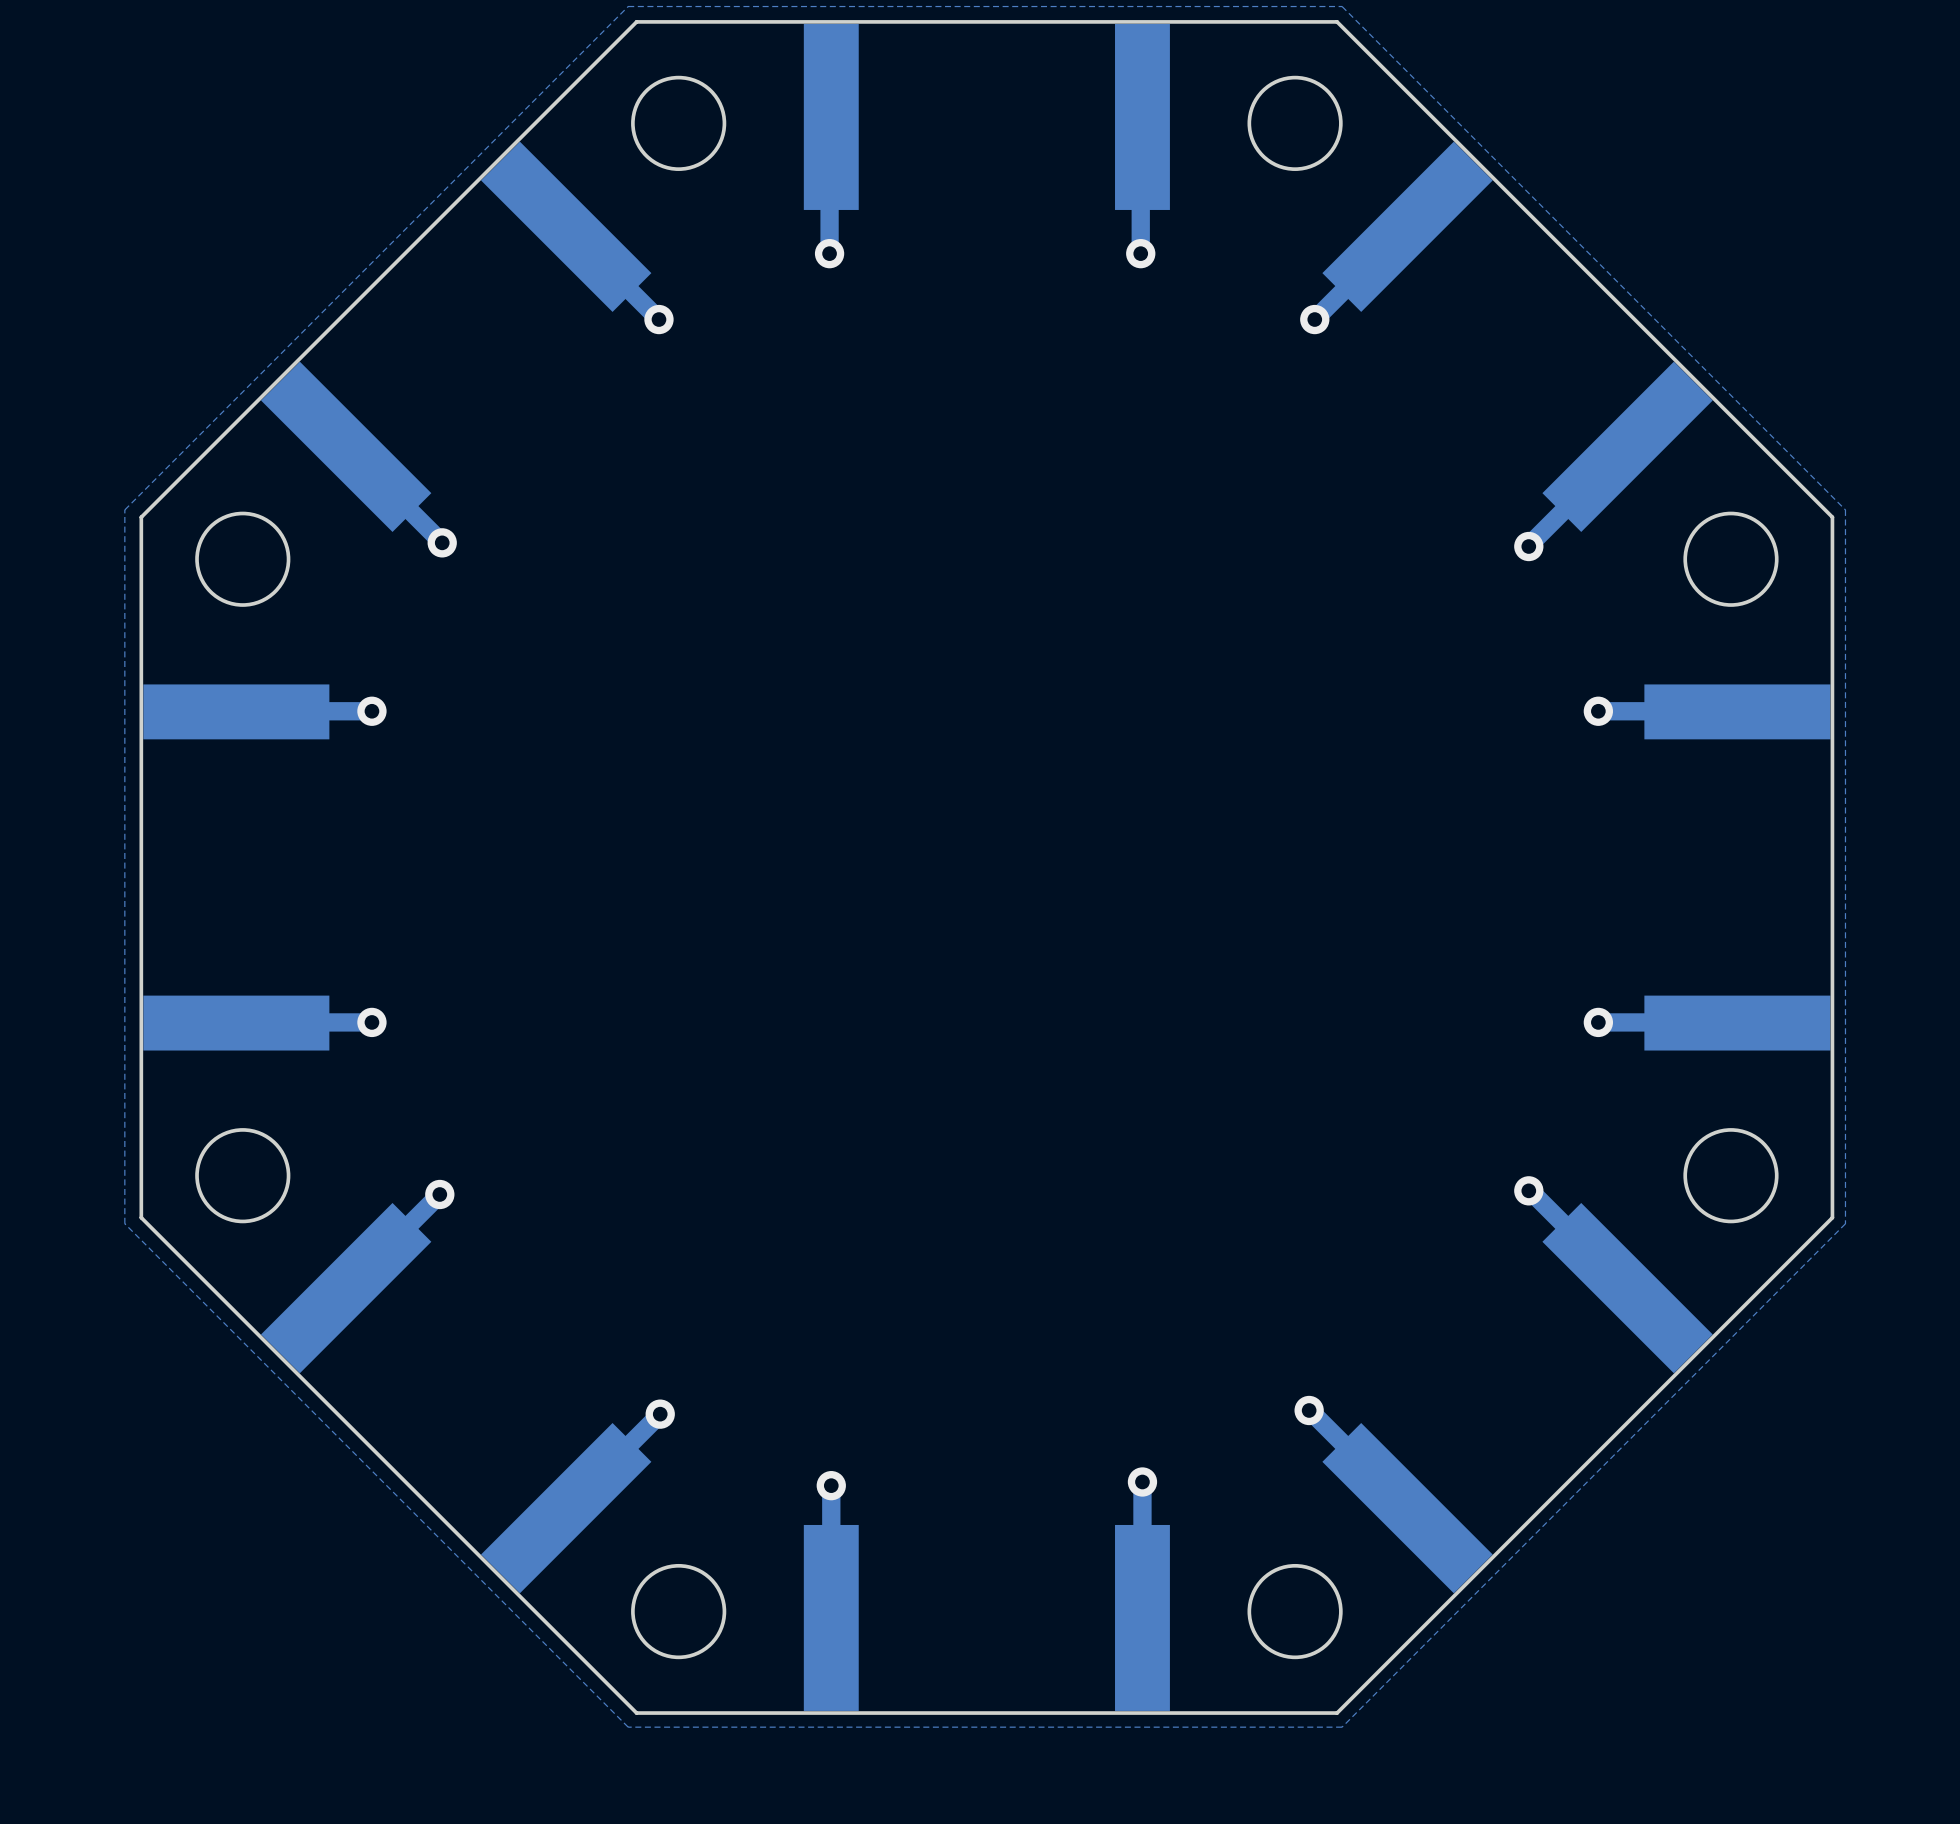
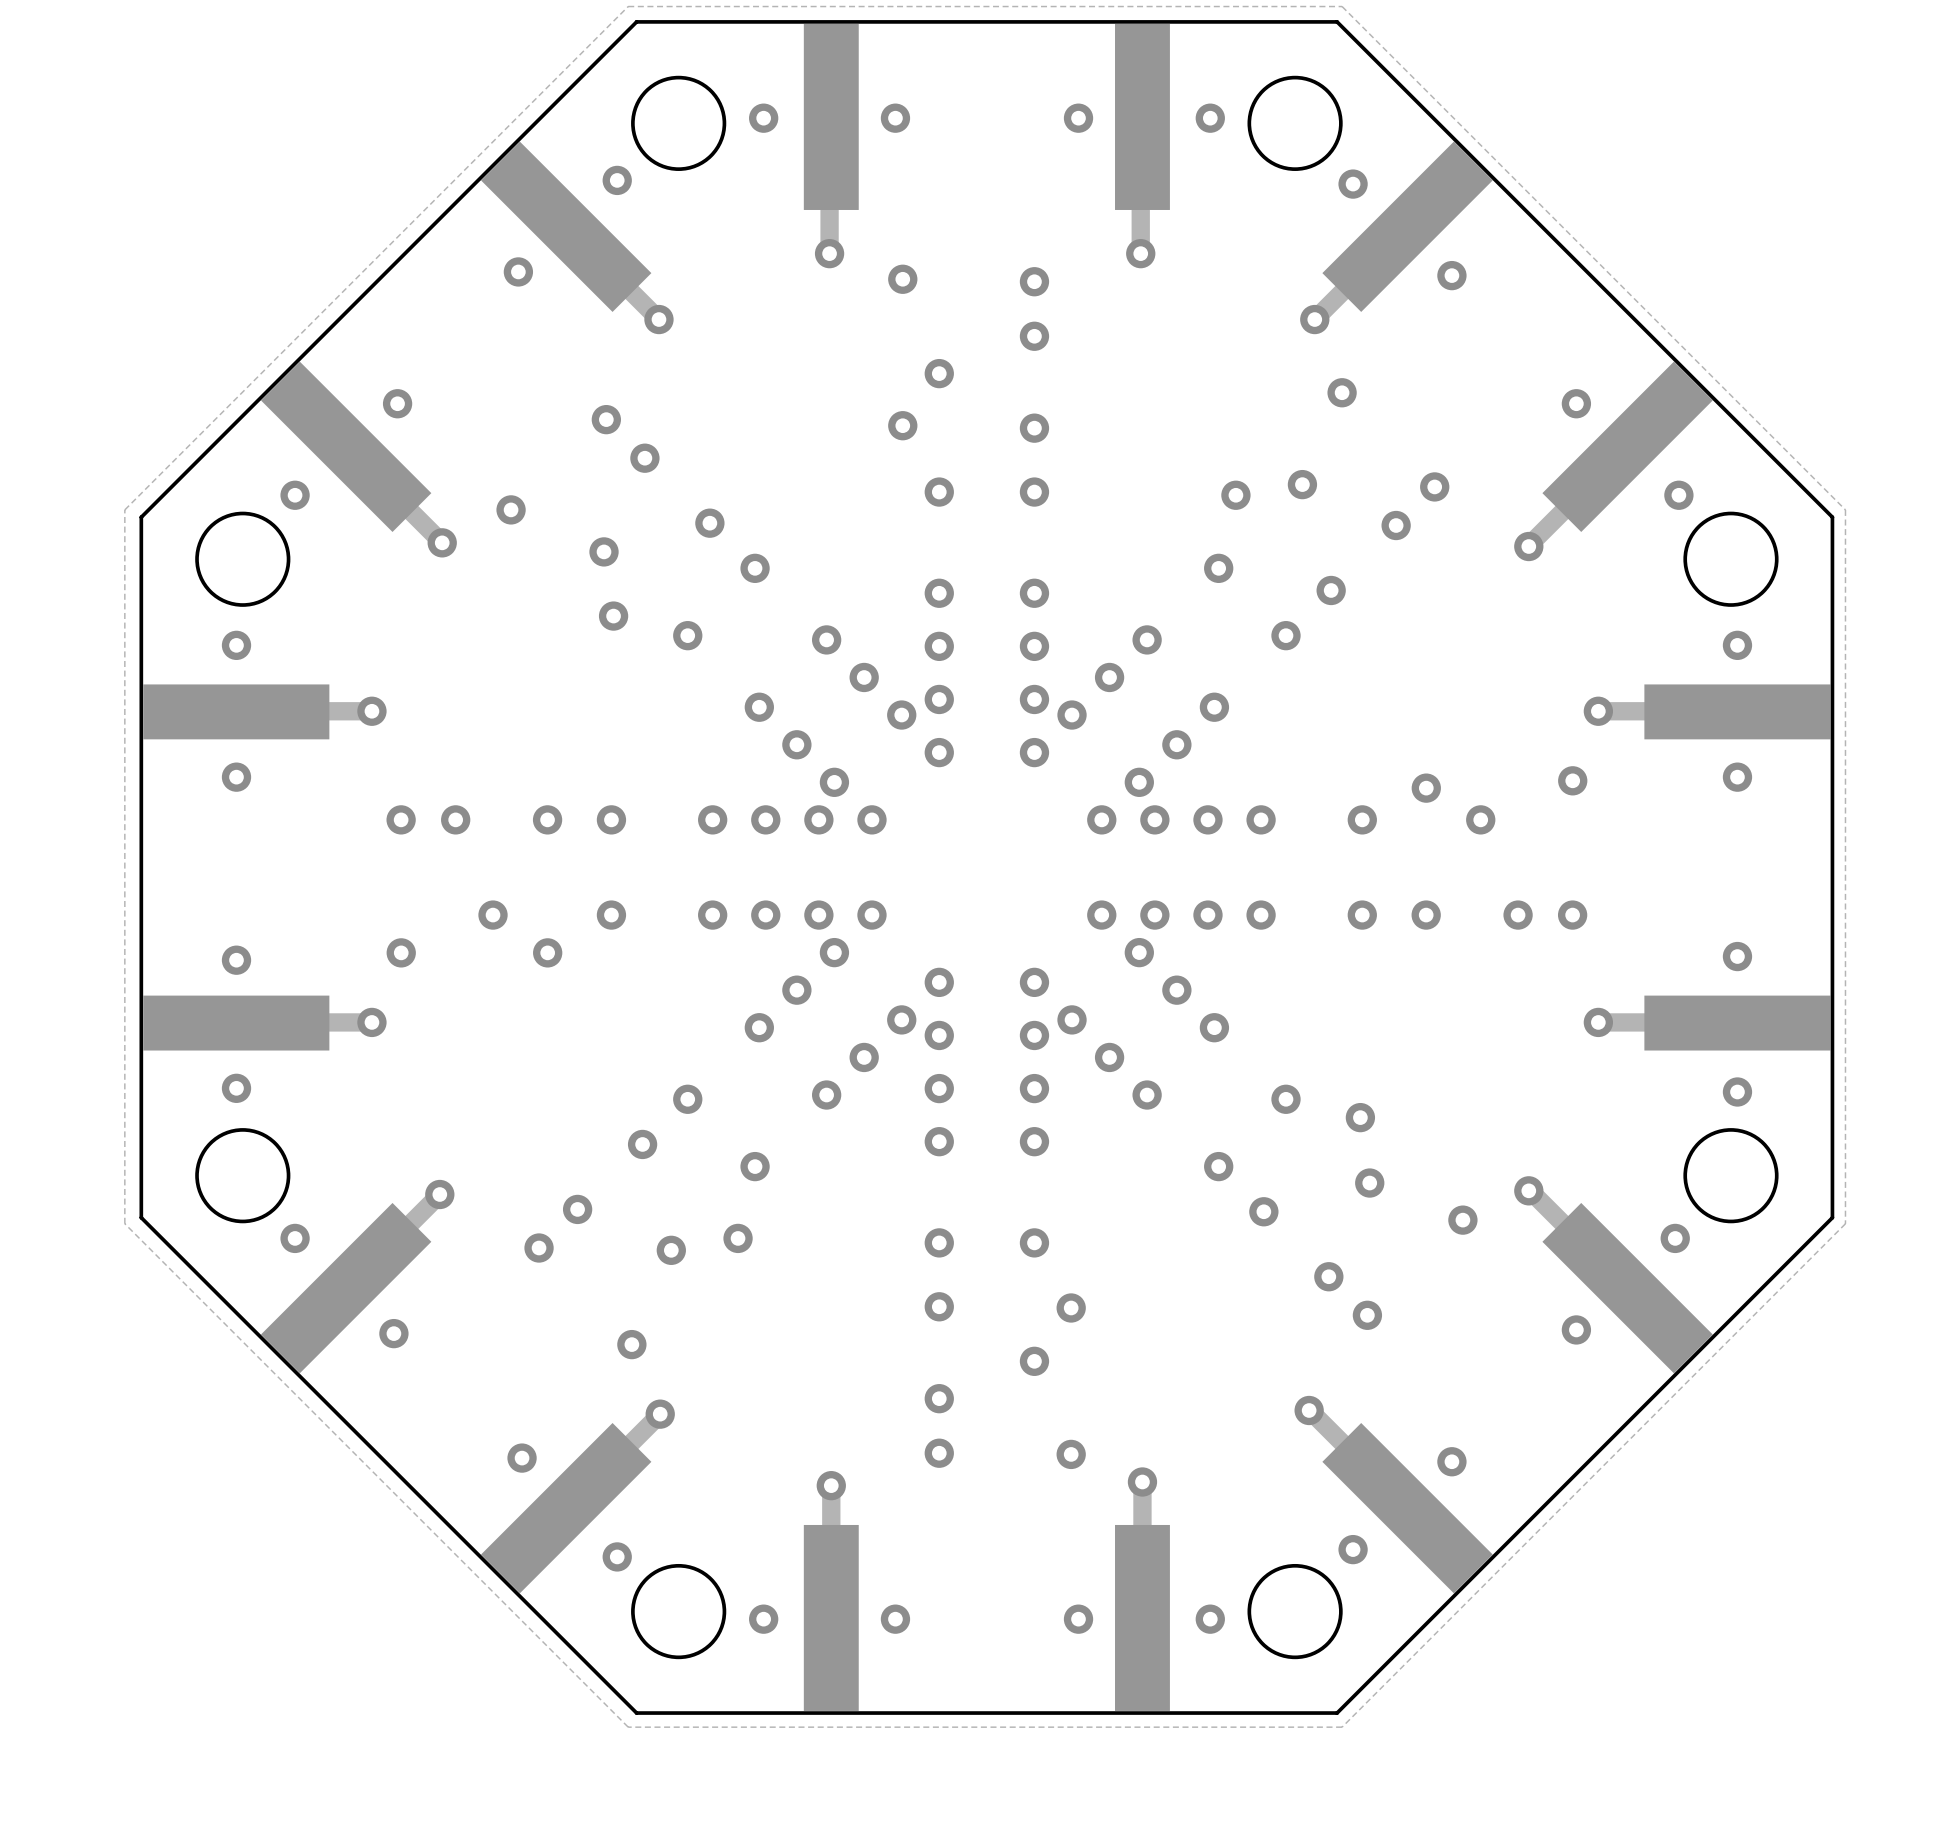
via: none -> (763, 118)
via: none -> (895, 118)
via: none -> (1078, 118)
via: none -> (1210, 118)
via: none -> (617, 180)
via: none -> (1353, 184)
via: none -> (518, 271)
via: none -> (1451, 275)
via: none -> (902, 279)
via: none -> (1034, 281)
via: none -> (1034, 336)
via: none -> (939, 373)
via: none -> (1342, 392)
via: none -> (397, 403)
via: none -> (1576, 403)
via: none -> (606, 419)
via: none -> (902, 425)
via: none -> (1034, 428)
via: none -> (644, 458)
via: none -> (1302, 484)
via: none -> (1434, 486)
via: none -> (939, 492)
via: none -> (1034, 492)
via: none -> (295, 495)
via: none -> (1235, 495)
via: none -> (1678, 495)
via: none -> (511, 509)
via: none -> (709, 523)
via: none -> (1396, 525)
via: none -> (604, 551)
via: none -> (755, 568)
via: none -> (1218, 568)
via: none -> (1331, 590)
via: none -> (939, 593)
via: none -> (1034, 593)
via: none -> (613, 616)
via: none -> (687, 635)
via: none -> (1286, 635)
via: none -> (826, 639)
via: none -> (1147, 639)
via: none -> (236, 645)
via: none -> (1737, 645)
via: none -> (939, 646)
via: none -> (1034, 646)
via: none -> (864, 677)
via: none -> (1109, 677)
via: none -> (939, 699)
via: none -> (1034, 699)
via: none -> (759, 707)
via: none -> (1214, 707)
via: none -> (901, 715)
via: none -> (1072, 715)
via: none -> (796, 744)
via: none -> (1176, 744)
via: none -> (939, 752)
via: none -> (1034, 752)
via: none -> (236, 777)
via: none -> (1737, 777)
via: none -> (1572, 780)
via: none -> (834, 782)
via: none -> (1139, 782)
via: none -> (1426, 788)
via: none -> (401, 819)
via: none -> (455, 819)
via: none -> (547, 819)
via: none -> (611, 819)
via: none -> (712, 819)
via: none -> (765, 819)
via: none -> (818, 819)
via: none -> (871, 819)
via: none -> (1101, 819)
via: none -> (1154, 819)
via: none -> (1207, 819)
via: none -> (1261, 819)
via: none -> (1362, 819)
via: none -> (1480, 819)
via: none -> (493, 915)
via: none -> (611, 915)
via: none -> (712, 915)
via: none -> (765, 915)
via: none -> (818, 915)
via: none -> (871, 915)
via: none -> (1101, 915)
via: none -> (1154, 915)
via: none -> (1207, 915)
via: none -> (1261, 915)
via: none -> (1362, 915)
via: none -> (1426, 915)
via: none -> (1518, 915)
via: none -> (1572, 915)
via: none -> (401, 952)
via: none -> (547, 952)
via: none -> (834, 952)
via: none -> (1139, 952)
via: none -> (1737, 956)
via: none -> (236, 960)
via: none -> (939, 982)
via: none -> (1034, 982)
via: none -> (796, 990)
via: none -> (1176, 990)
via: none -> (901, 1019)
via: none -> (1072, 1019)
via: none -> (759, 1027)
via: none -> (1214, 1027)
via: none -> (939, 1035)
via: none -> (1034, 1035)
via: none -> (864, 1057)
via: none -> (1109, 1057)
via: none -> (236, 1088)
via: none -> (939, 1088)
via: none -> (1034, 1088)
via: none -> (1737, 1091)
via: none -> (826, 1095)
via: none -> (1147, 1095)
via: none -> (687, 1099)
via: none -> (1286, 1099)
via: none -> (1360, 1117)
via: none -> (939, 1141)
via: none -> (1034, 1141)
via: none -> (642, 1144)
via: none -> (755, 1166)
via: none -> (1218, 1166)
via: none -> (1369, 1183)
via: none -> (577, 1209)
via: none -> (1263, 1211)
via: none -> (1462, 1220)
via: none -> (295, 1238)
via: none -> (738, 1238)
via: none -> (1675, 1238)
via: none -> (939, 1242)
via: none -> (1034, 1242)
via: none -> (539, 1248)
via: none -> (671, 1250)
via: none -> (1328, 1276)
via: none -> (939, 1306)
via: none -> (1071, 1307)
via: none -> (1367, 1315)
via: none -> (1576, 1329)
via: none -> (393, 1333)
via: none -> (631, 1344)
via: none -> (1034, 1361)
via: none -> (939, 1398)
via: none -> (939, 1453)
via: none -> (1071, 1454)
via: none -> (522, 1458)
via: none -> (1451, 1461)
via: none -> (1353, 1549)
via: none -> (617, 1556)
via: none -> (763, 1619)
via: none -> (895, 1619)
via: none -> (1078, 1619)
via: none -> (1210, 1619)

